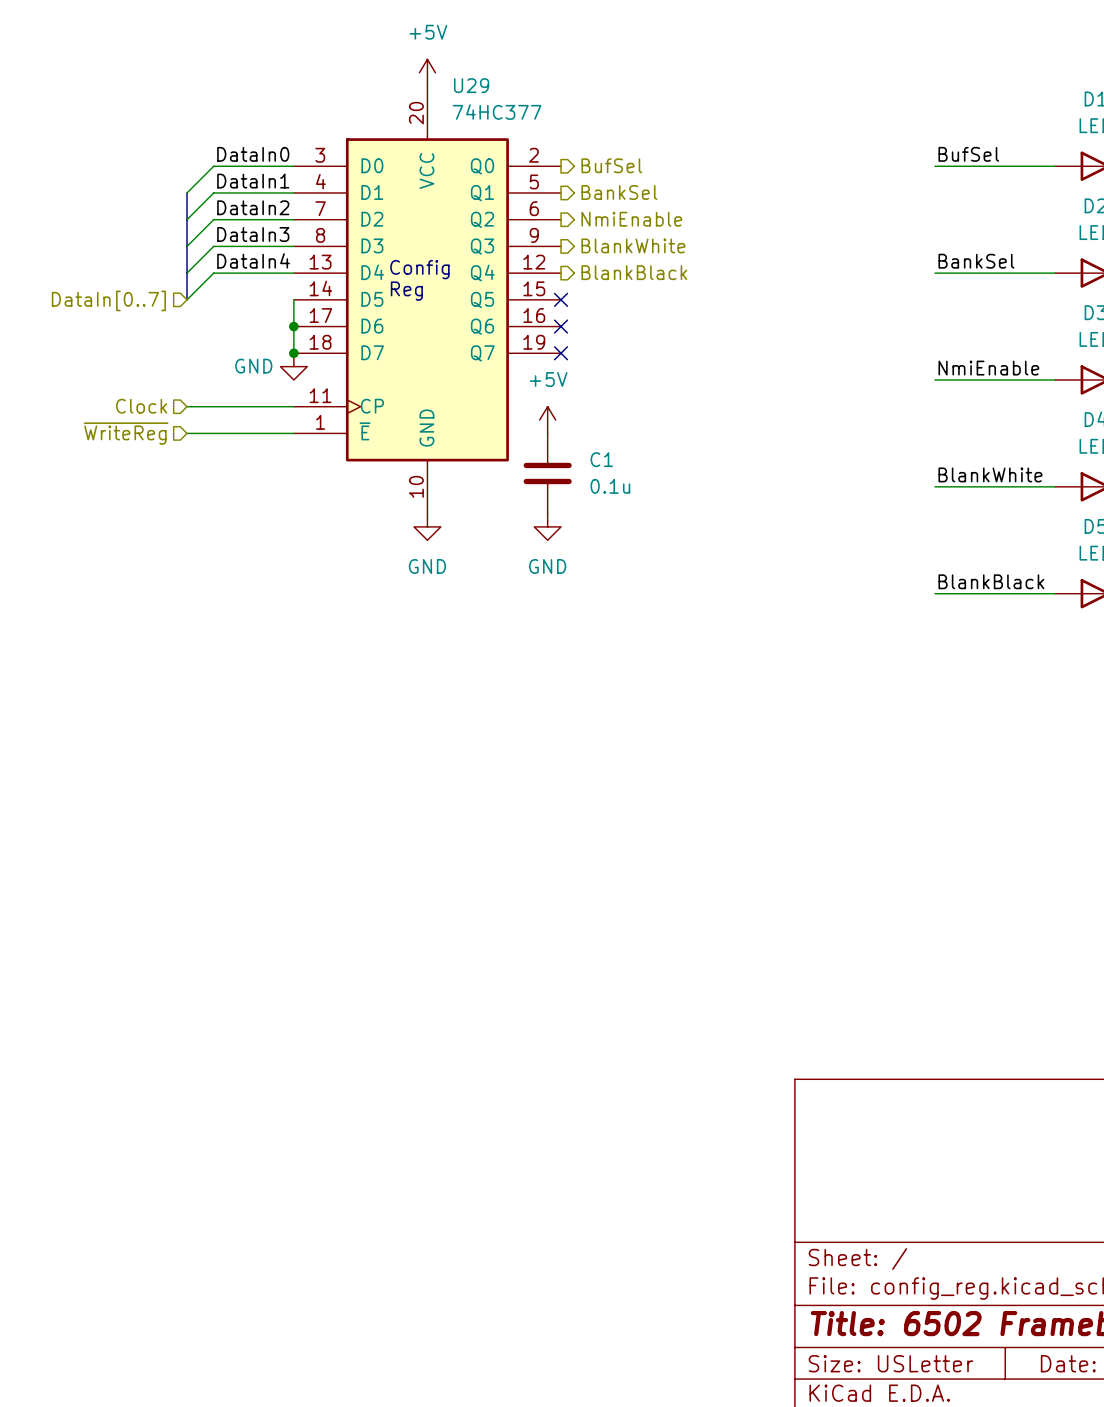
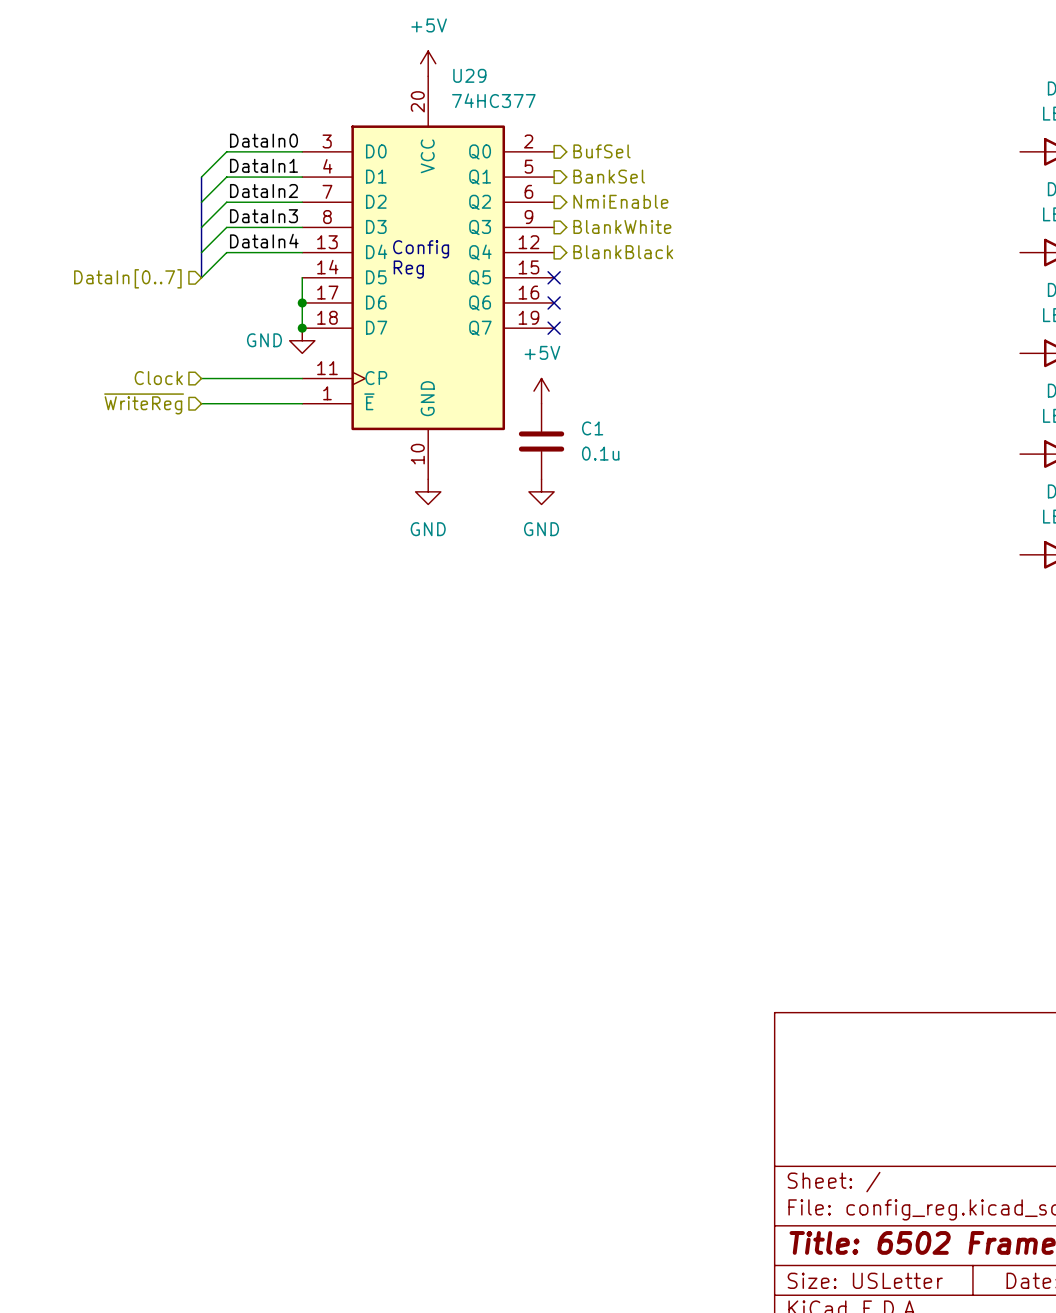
label: BufSel (968, 154) -> none
wire: (935, 166) (1055, 166) -> none
label: BankSel (976, 261) -> none
wire: (935, 273) (1055, 273) -> none
label: NmiEnable (988, 368) -> none
wire: (935, 379) (1055, 379) -> none
label: BlankWhite (990, 474) -> none
wire: (935, 486) (1055, 486) -> none
label: BlankBlack (991, 581) -> none
wire: (935, 593) (1055, 593) -> none

